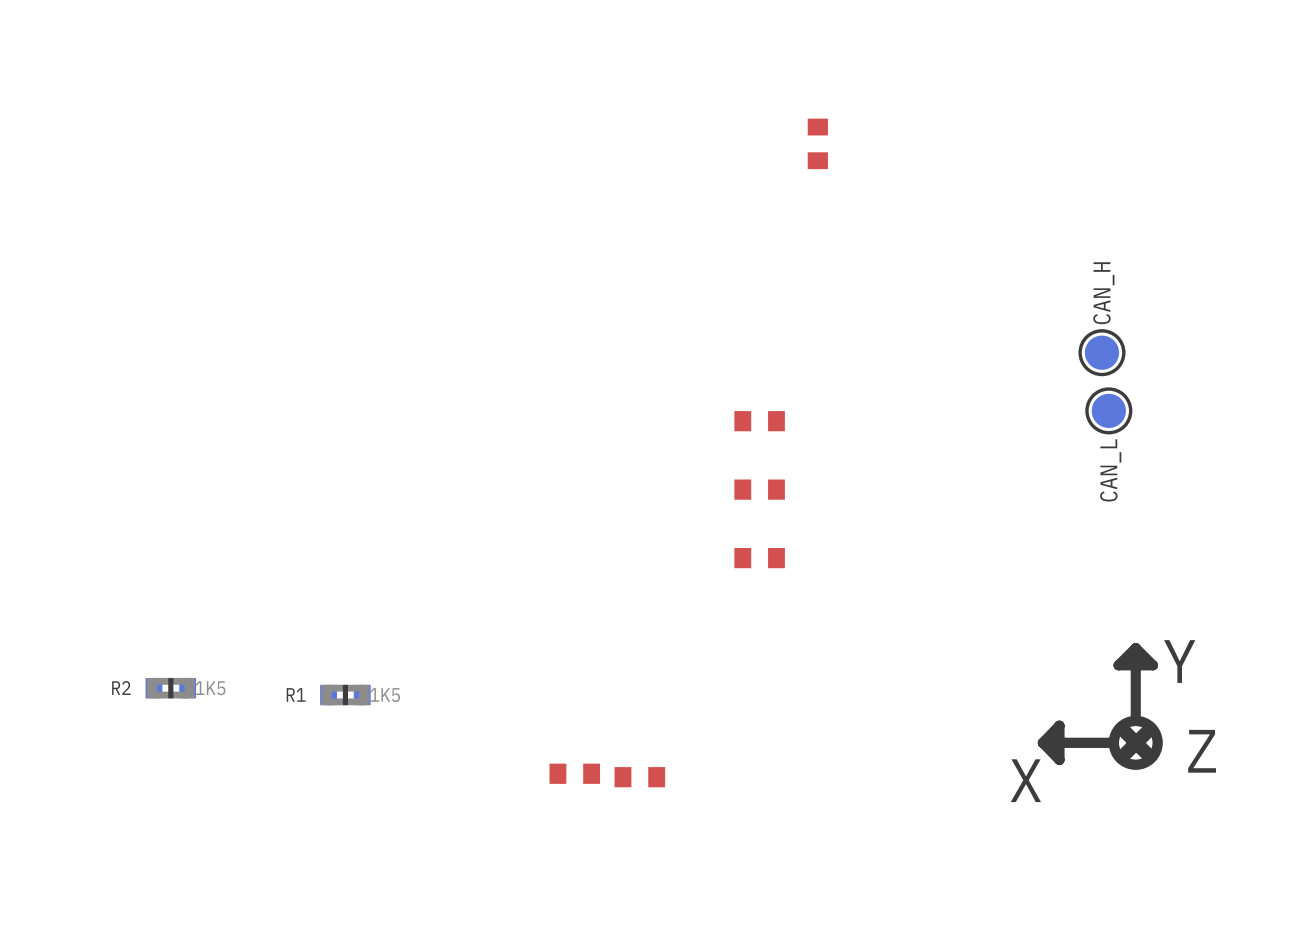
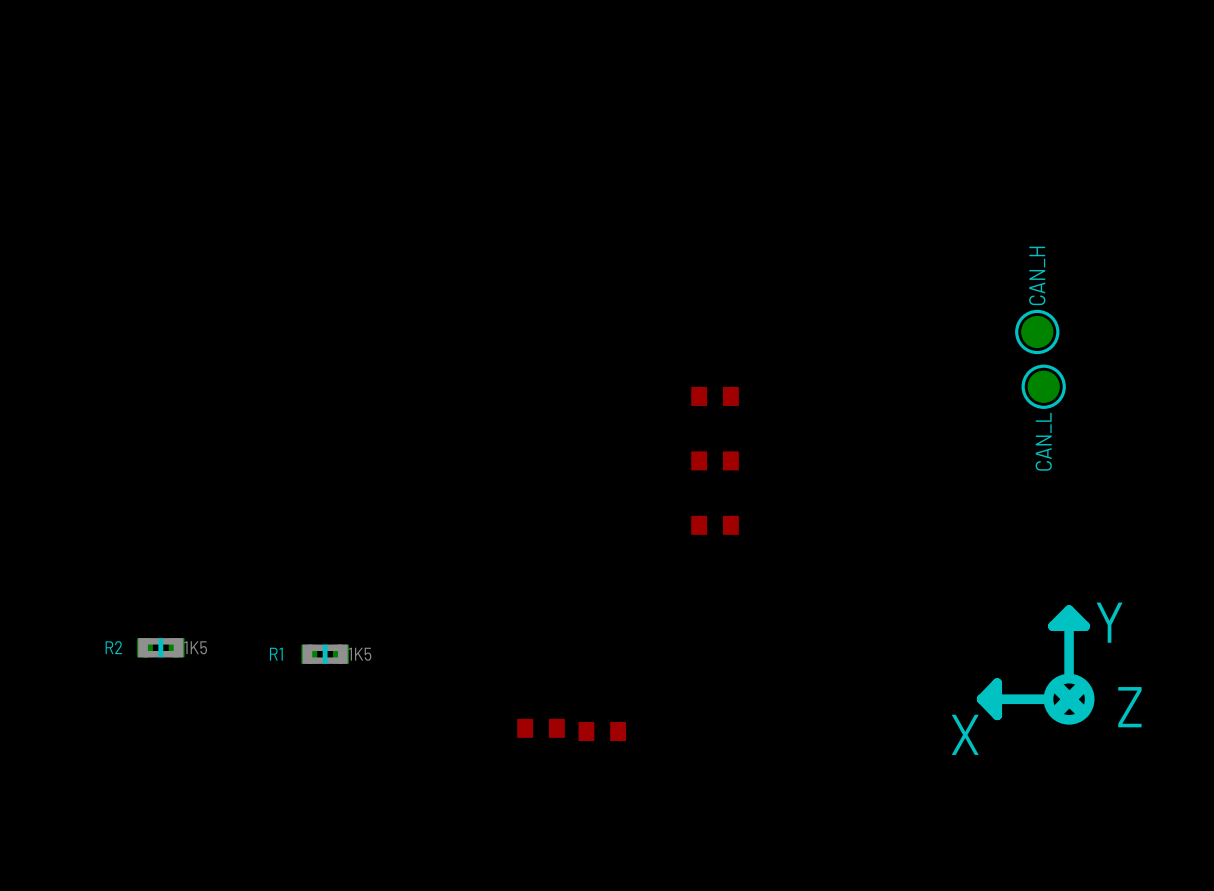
part: (817, 143) -> none

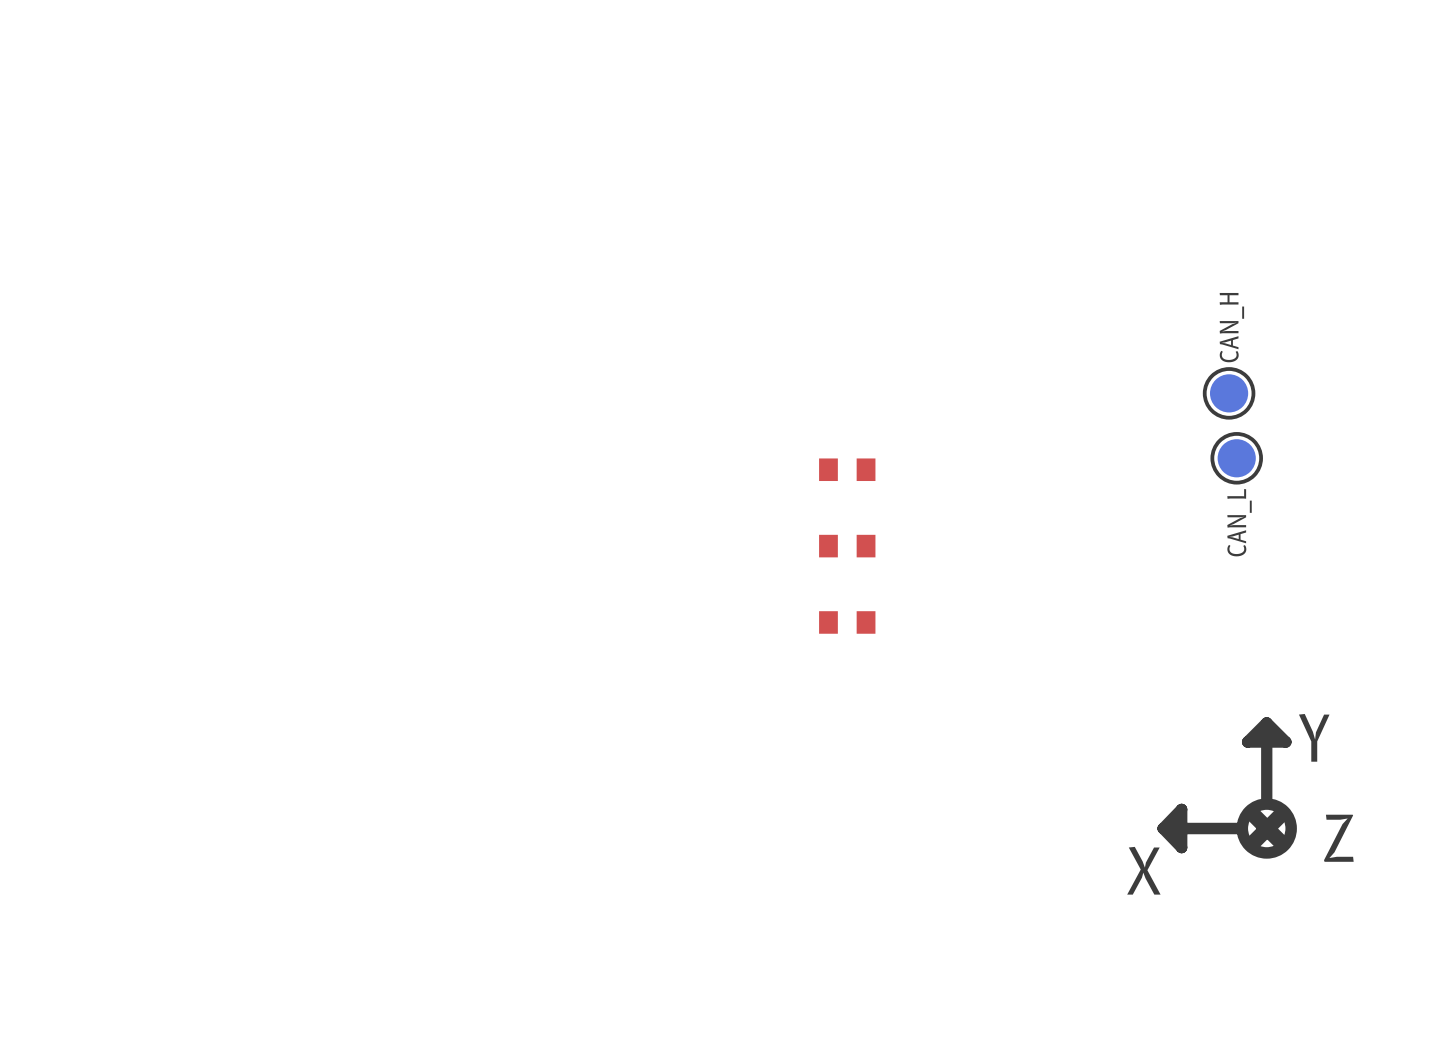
R2: 1K5 (160, 647) -> none
R1: 1K5 (325, 654) -> none
part: (541, 728) -> none
part: (602, 731) -> none

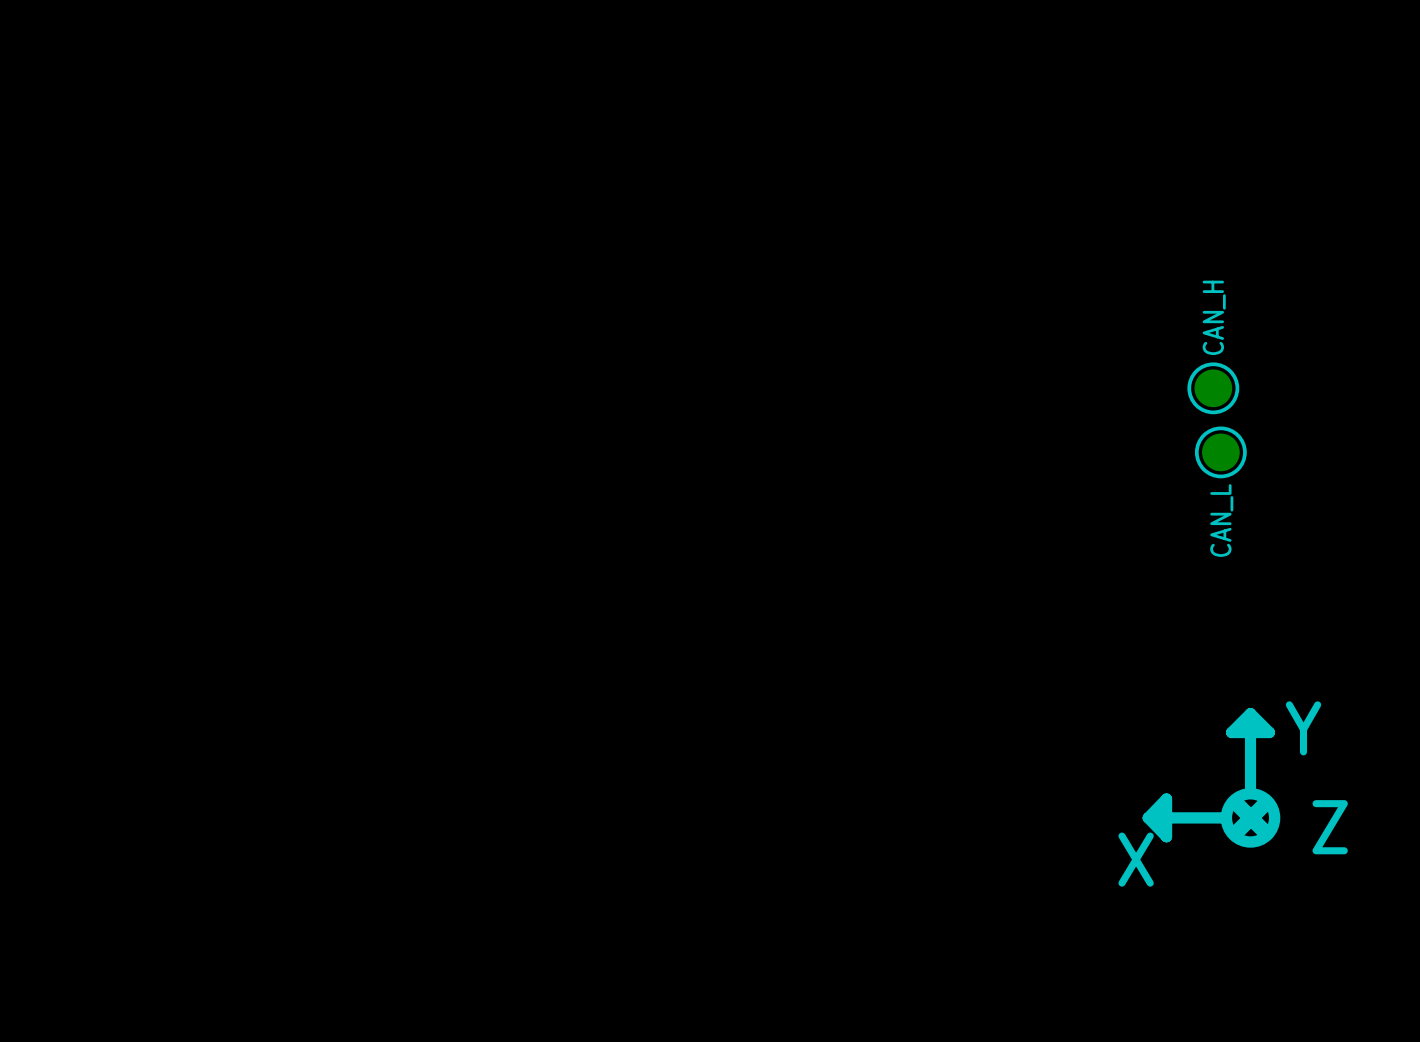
part: (847, 469) -> none
part: (847, 546) -> none
part: (847, 622) -> none

